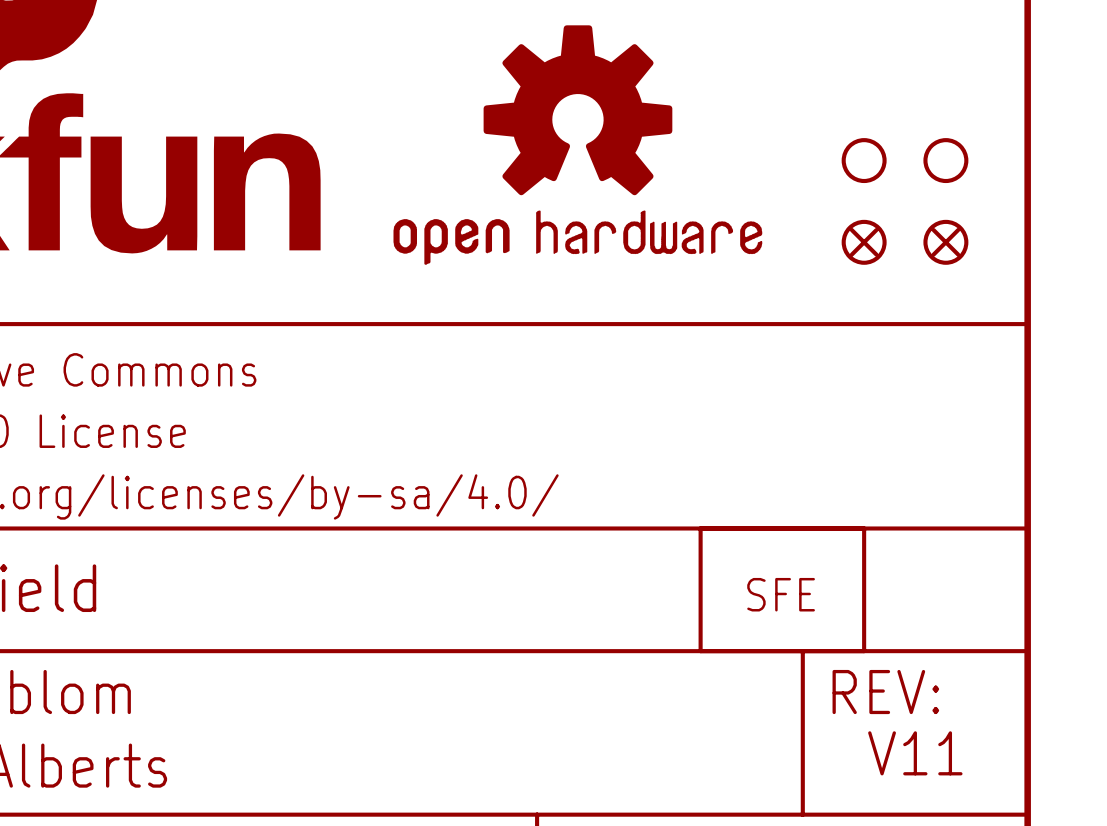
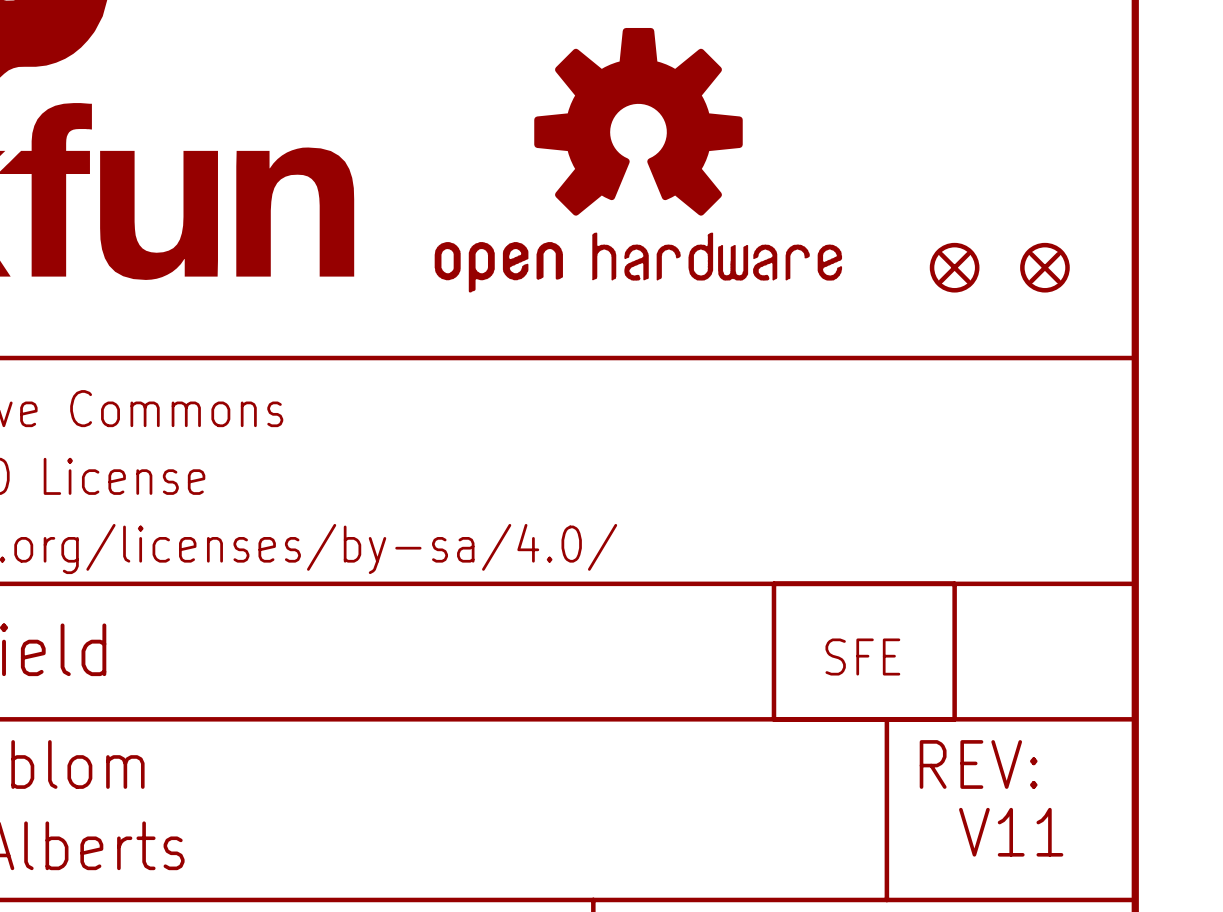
part: (864, 160) -> none
part: (945, 160) -> none

